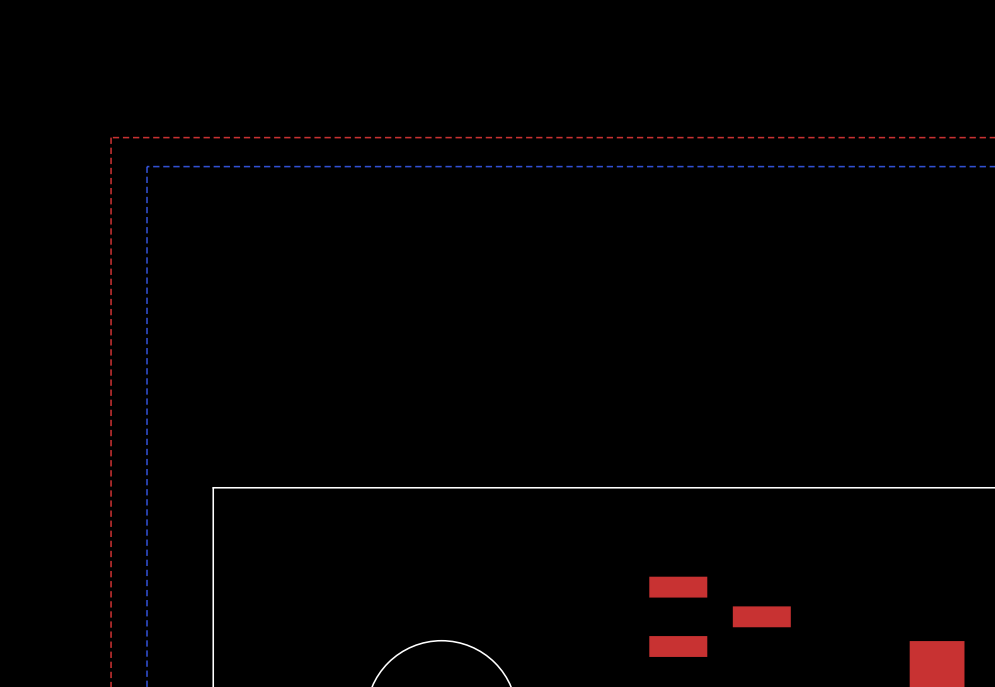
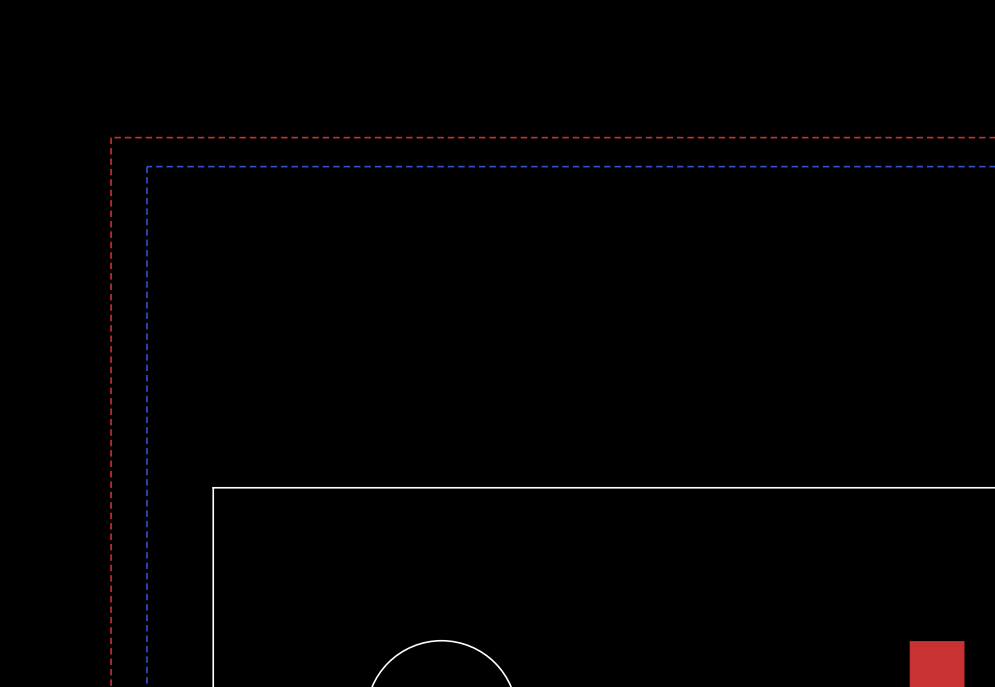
part: (720, 616) -> none

